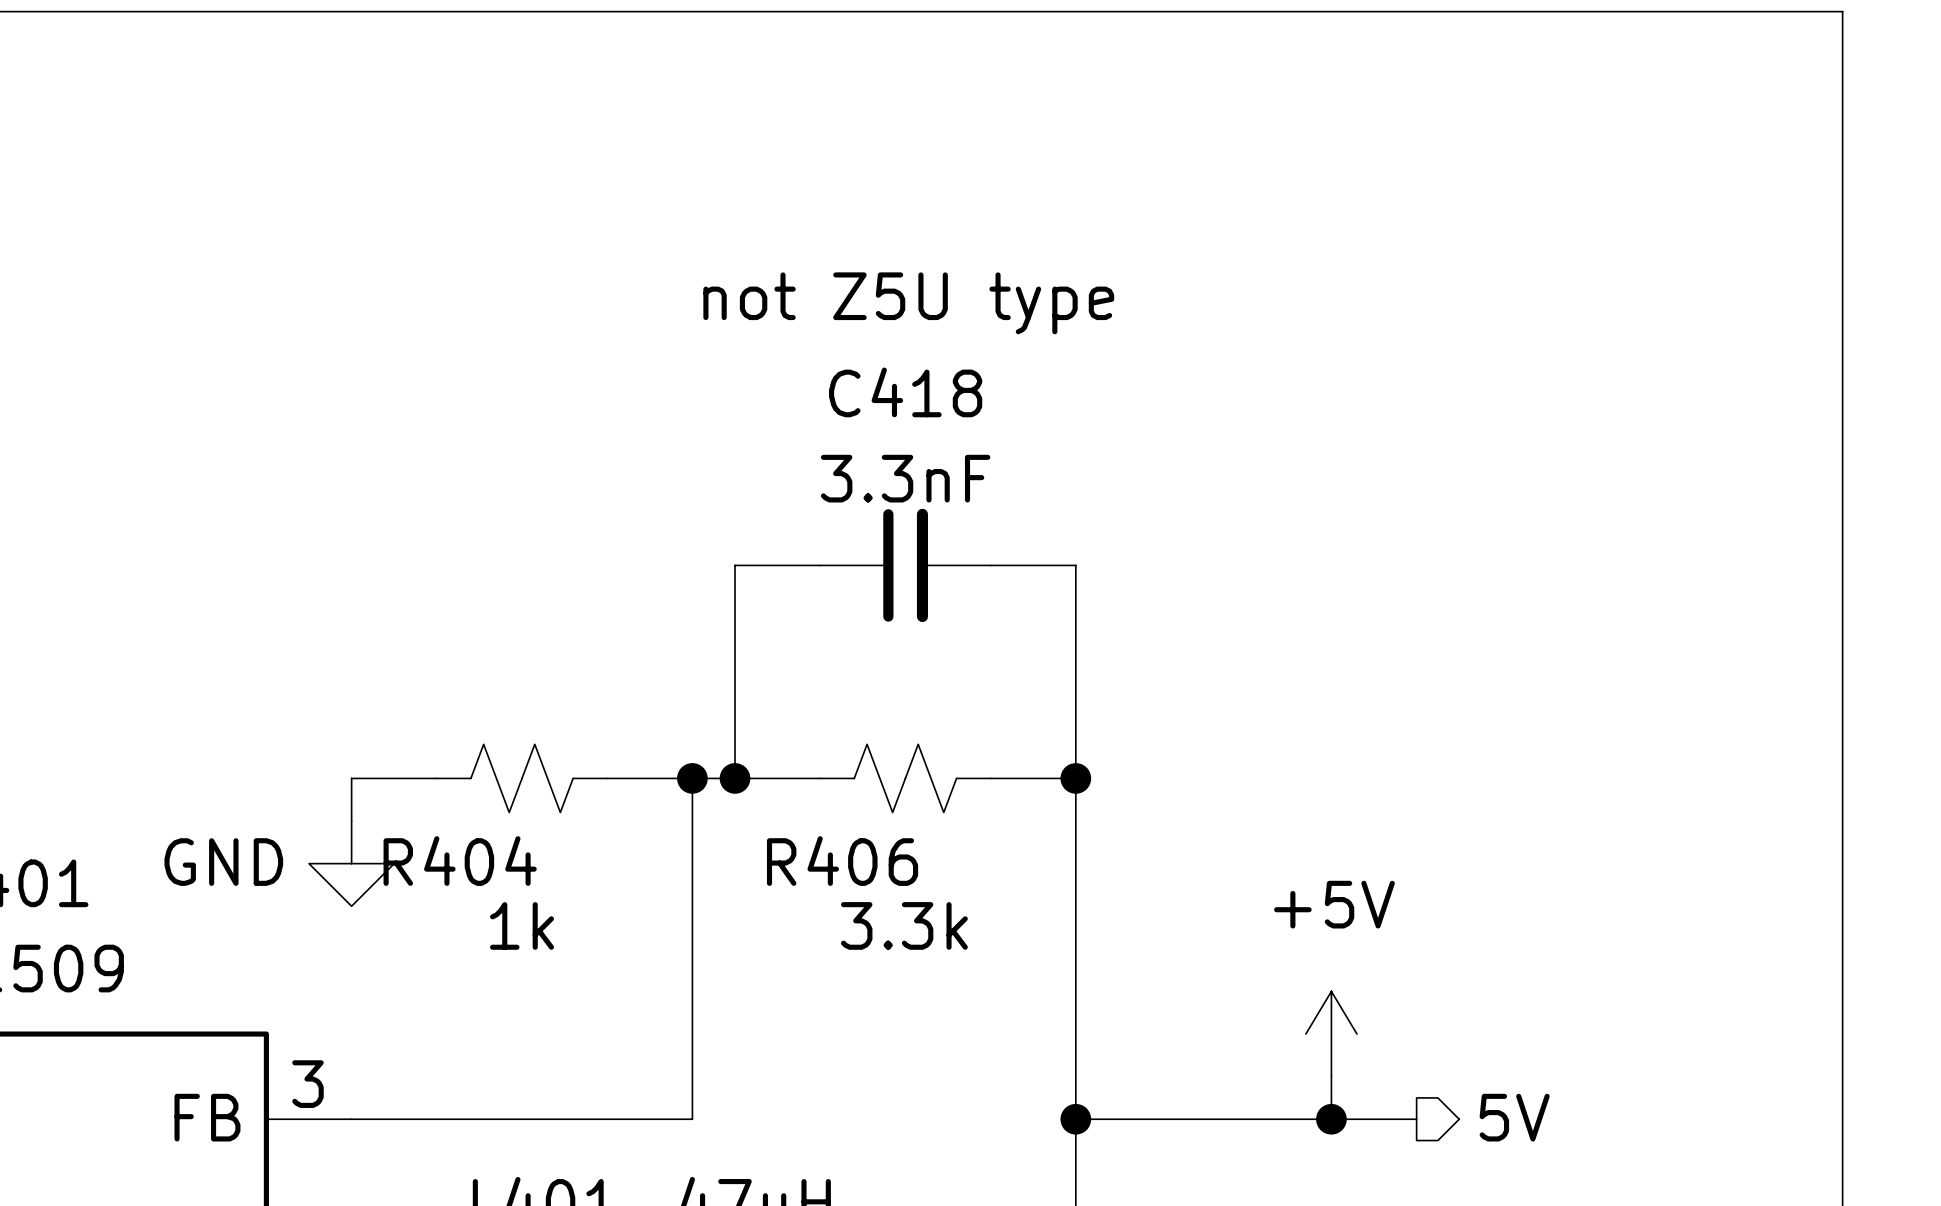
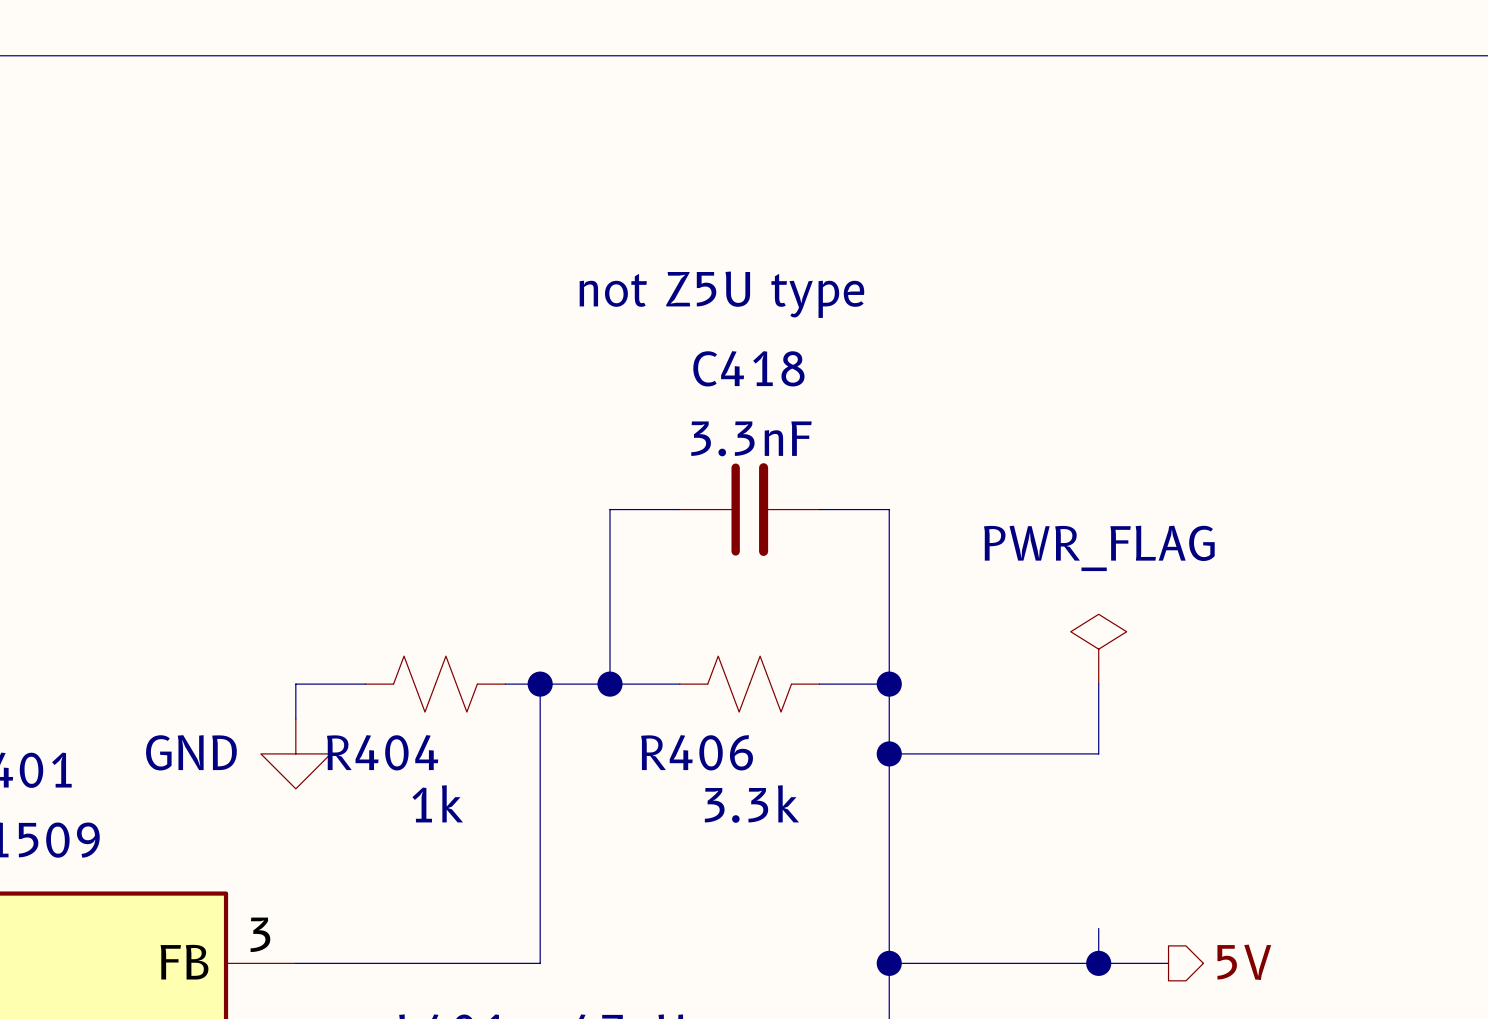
power symbol: none -> PWR_FLAG (1098, 649)
wire: (692, 778) (692, 1119) (649, 1119) -> (540, 684) (540, 963)
junction position: (692, 778) -> (540, 684)
wire: none -> (1098, 684) (1098, 753) (889, 753)
junction: none -> (889, 753)
power symbol: +5V (1331, 1034) -> none

